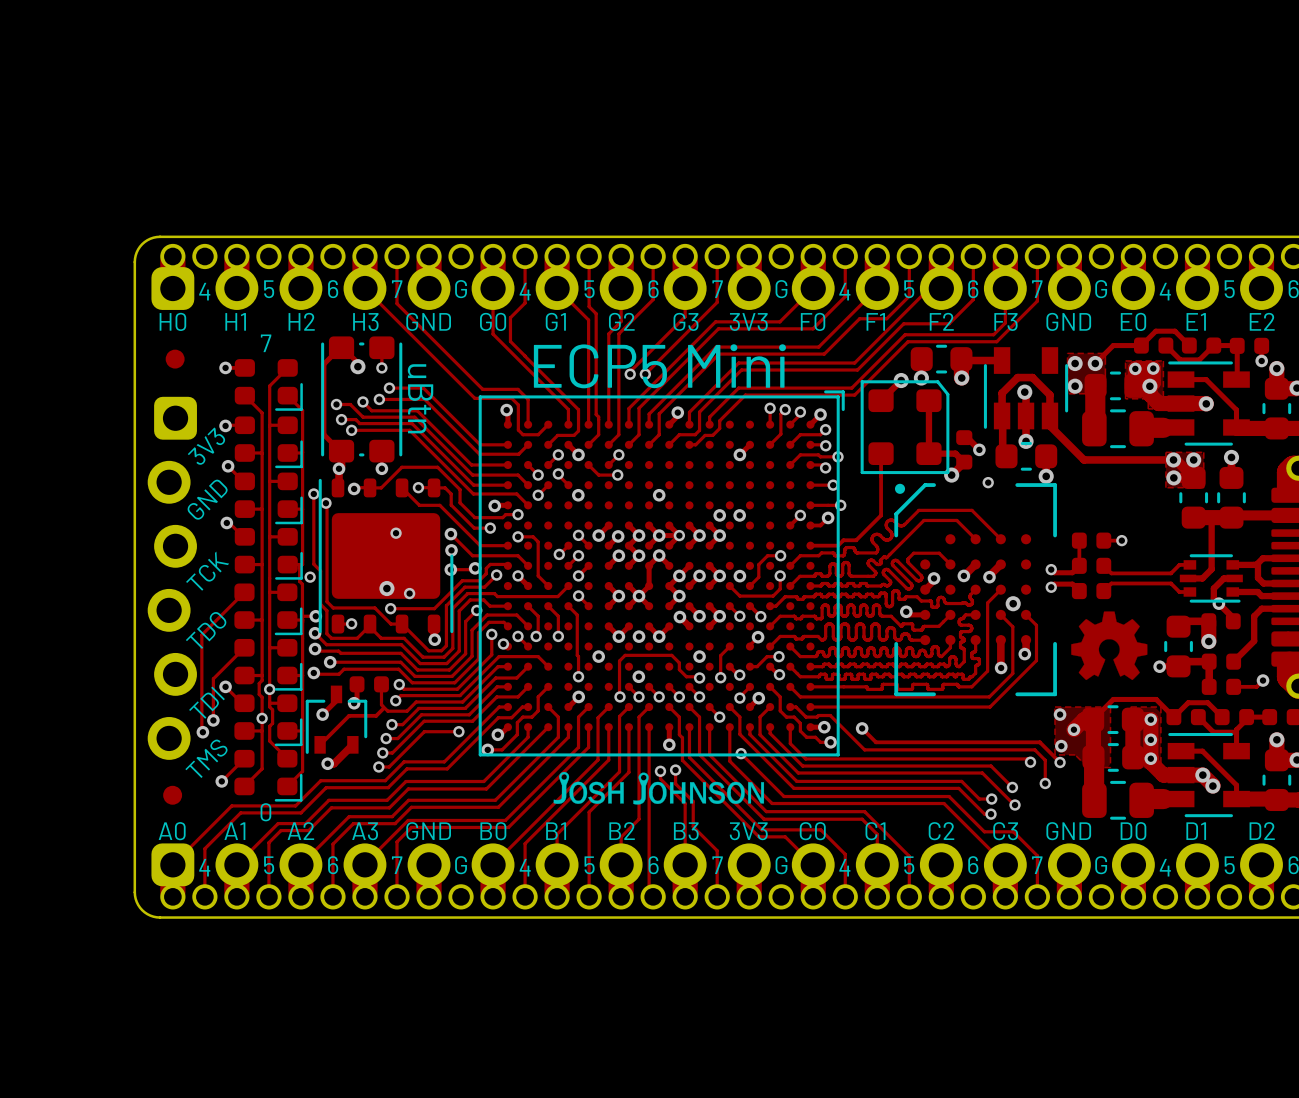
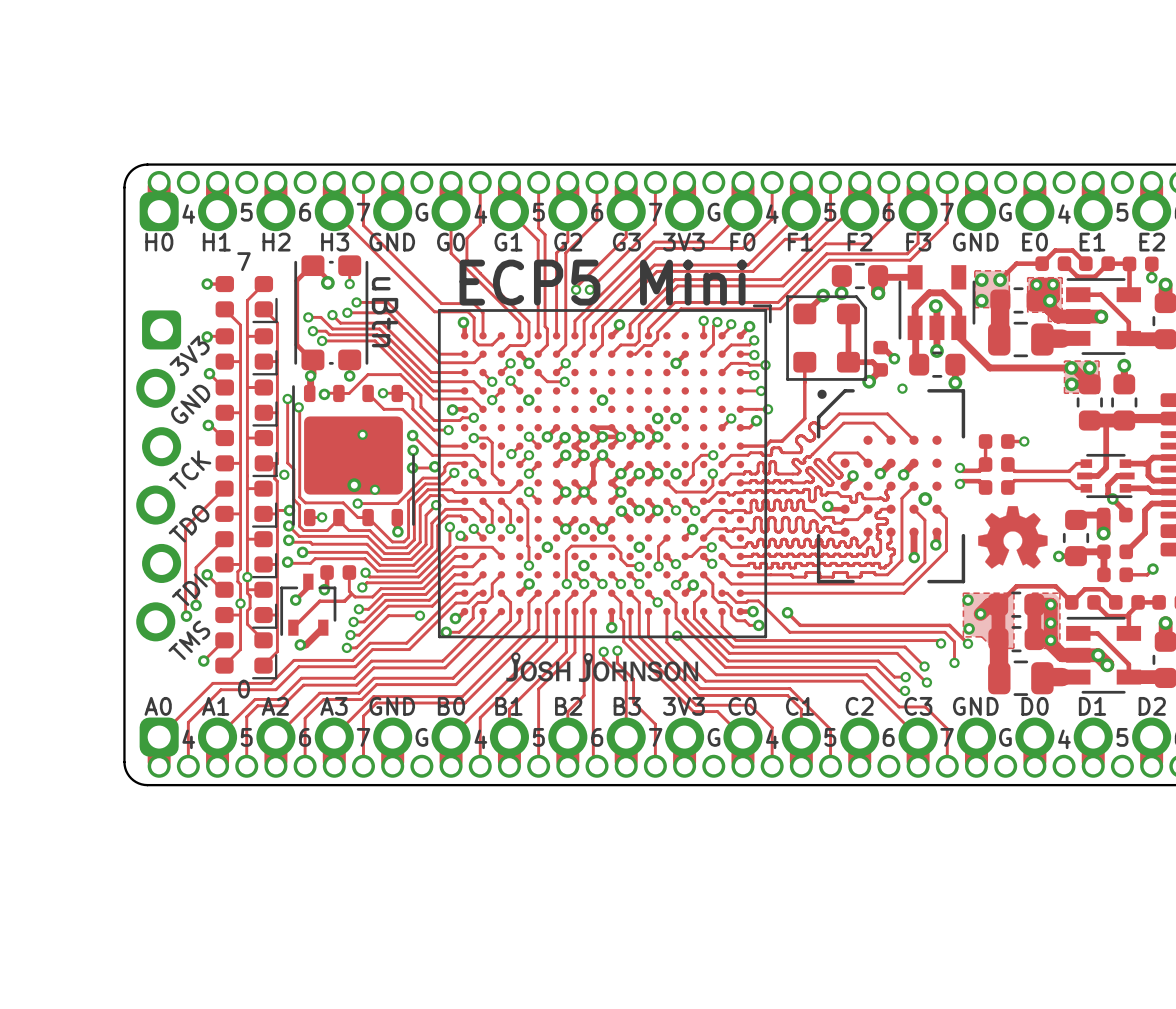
part: (175, 359) -> none
track: none -> (593, 427) (611, 427)
part: (172, 795) -> none

